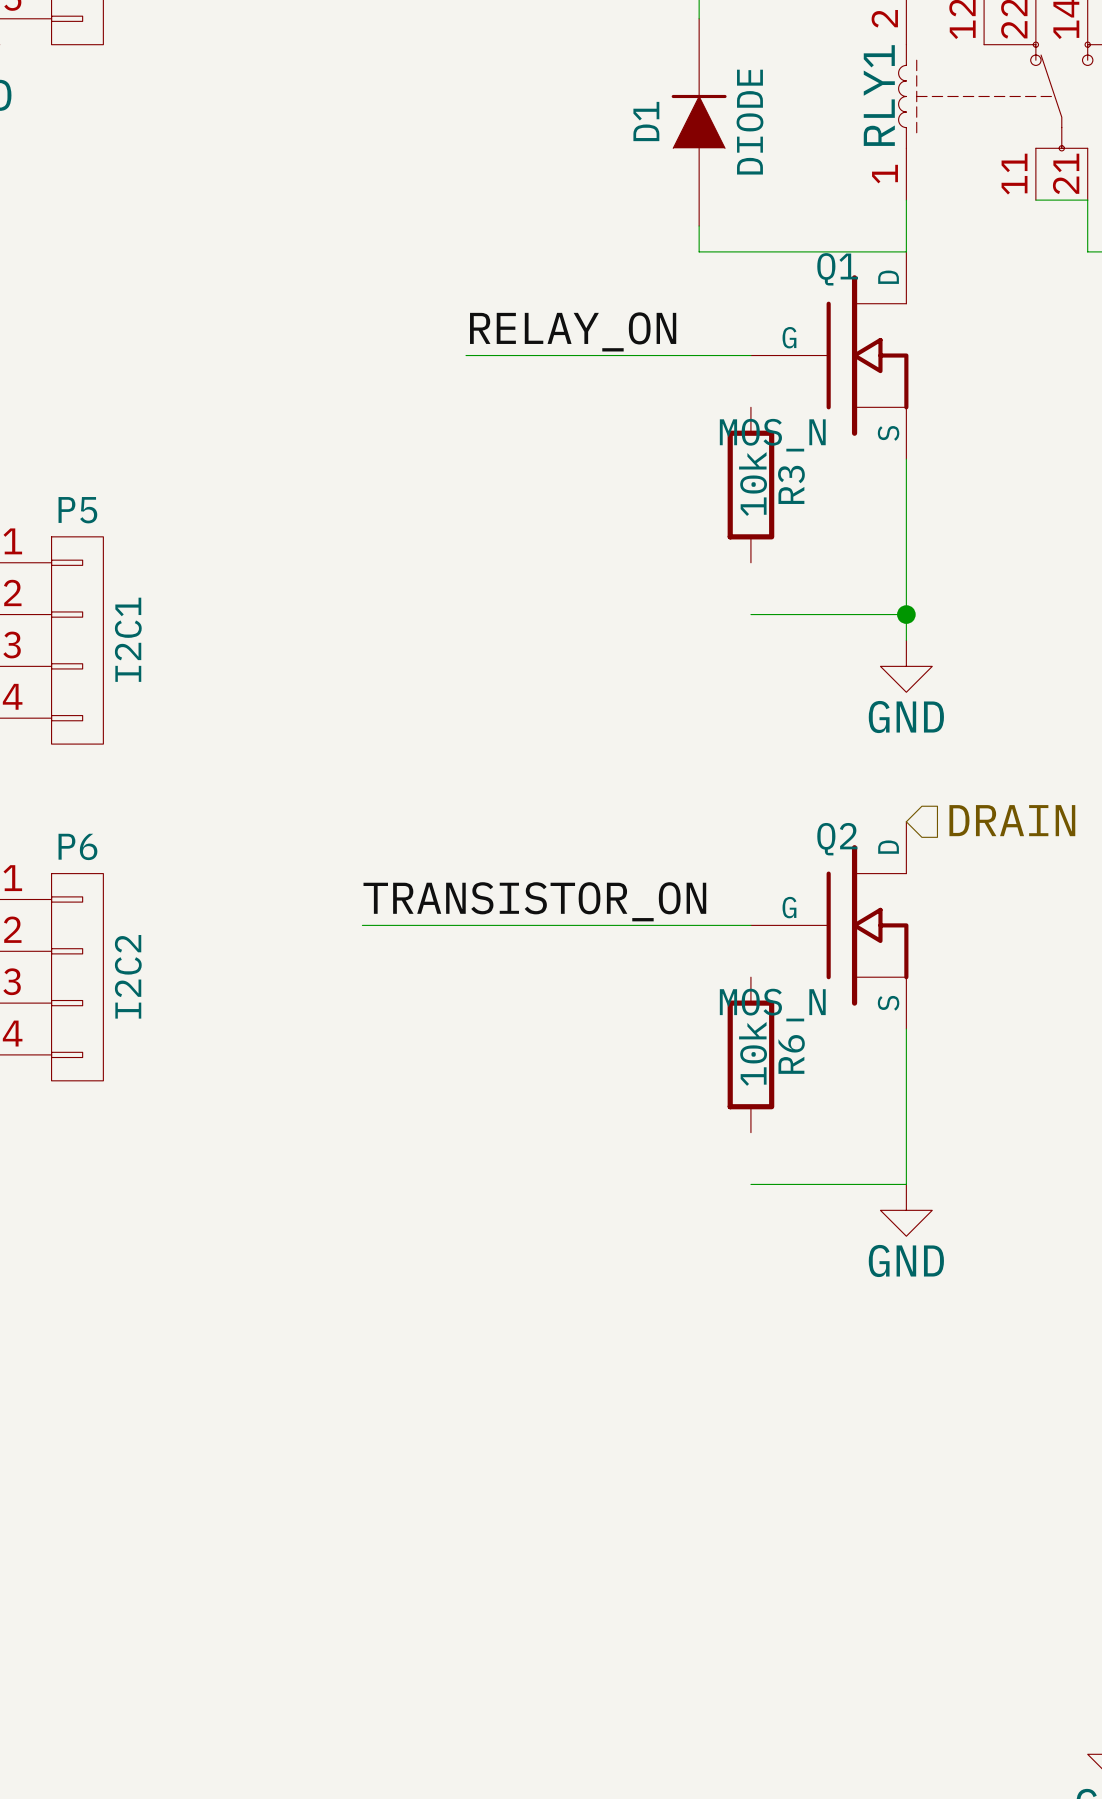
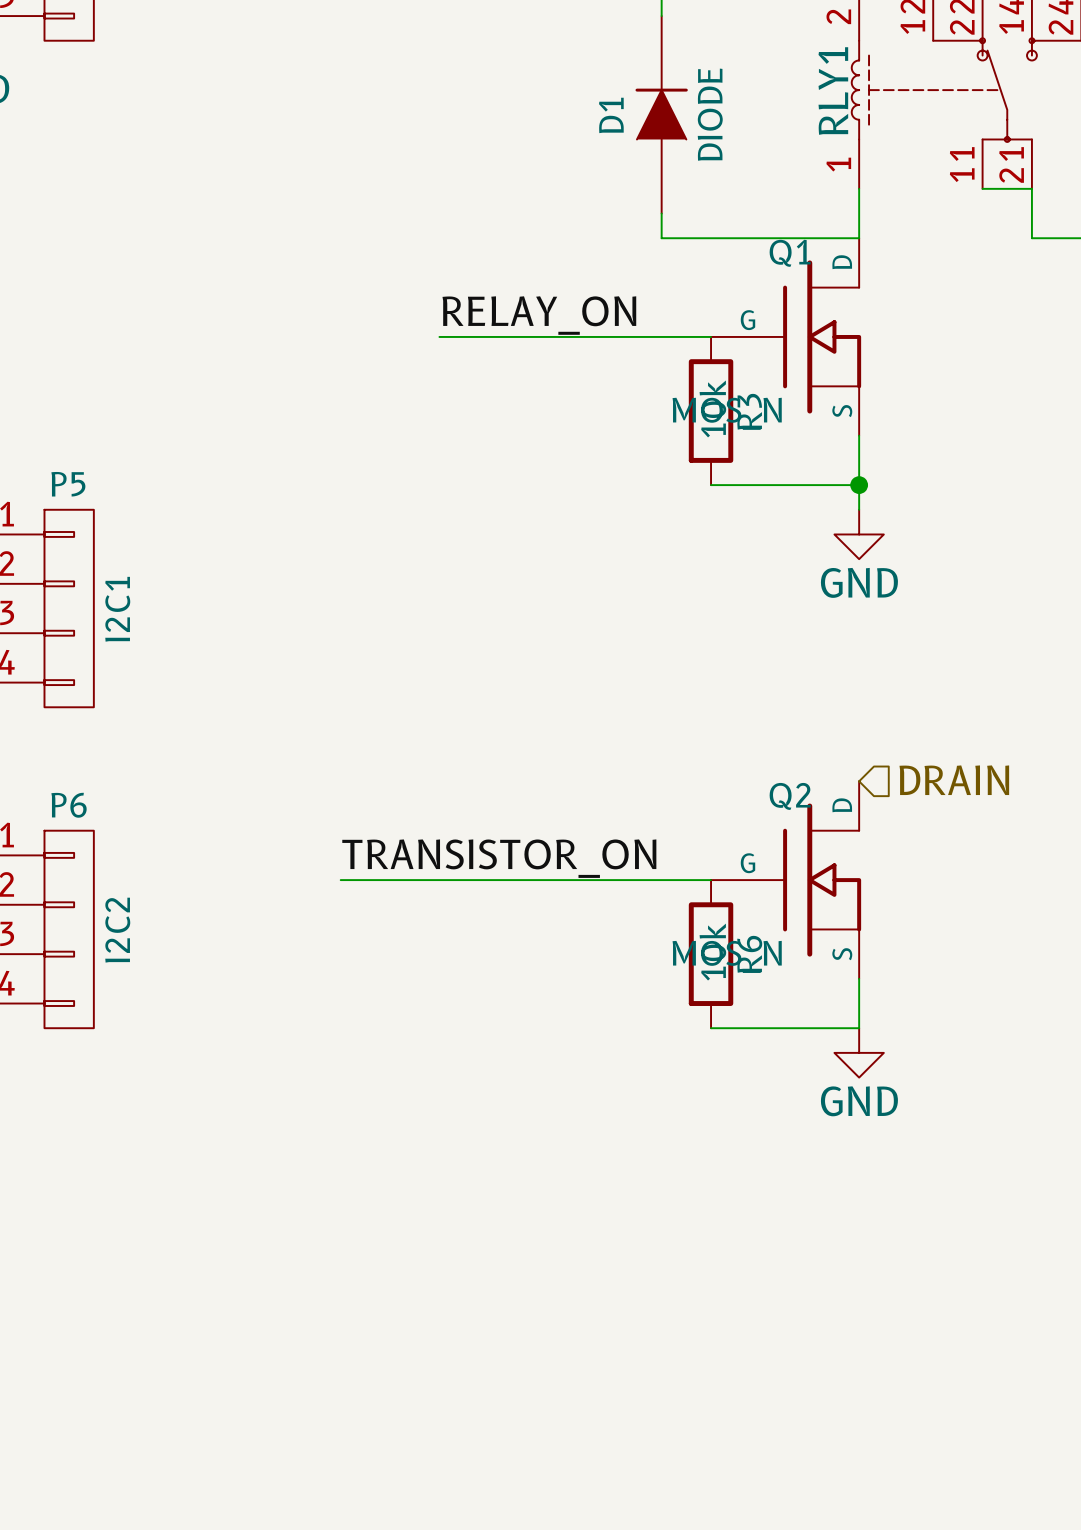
R3 position: (750, 485) -> (711, 411)
wire: (906, 536) (906, 640) -> none
wire: (750, 614) (906, 614) -> (711, 485) (859, 485)
junction position: (906, 614) -> (859, 485)
power symbol position: GND (906, 666) -> GND (859, 534)
R6 position: (750, 1054) -> (711, 954)
wire: (906, 1080) (906, 1184) (750, 1184) -> (859, 1028) (711, 1028)
power symbol position: GND (906, 1210) -> GND (859, 1052)

